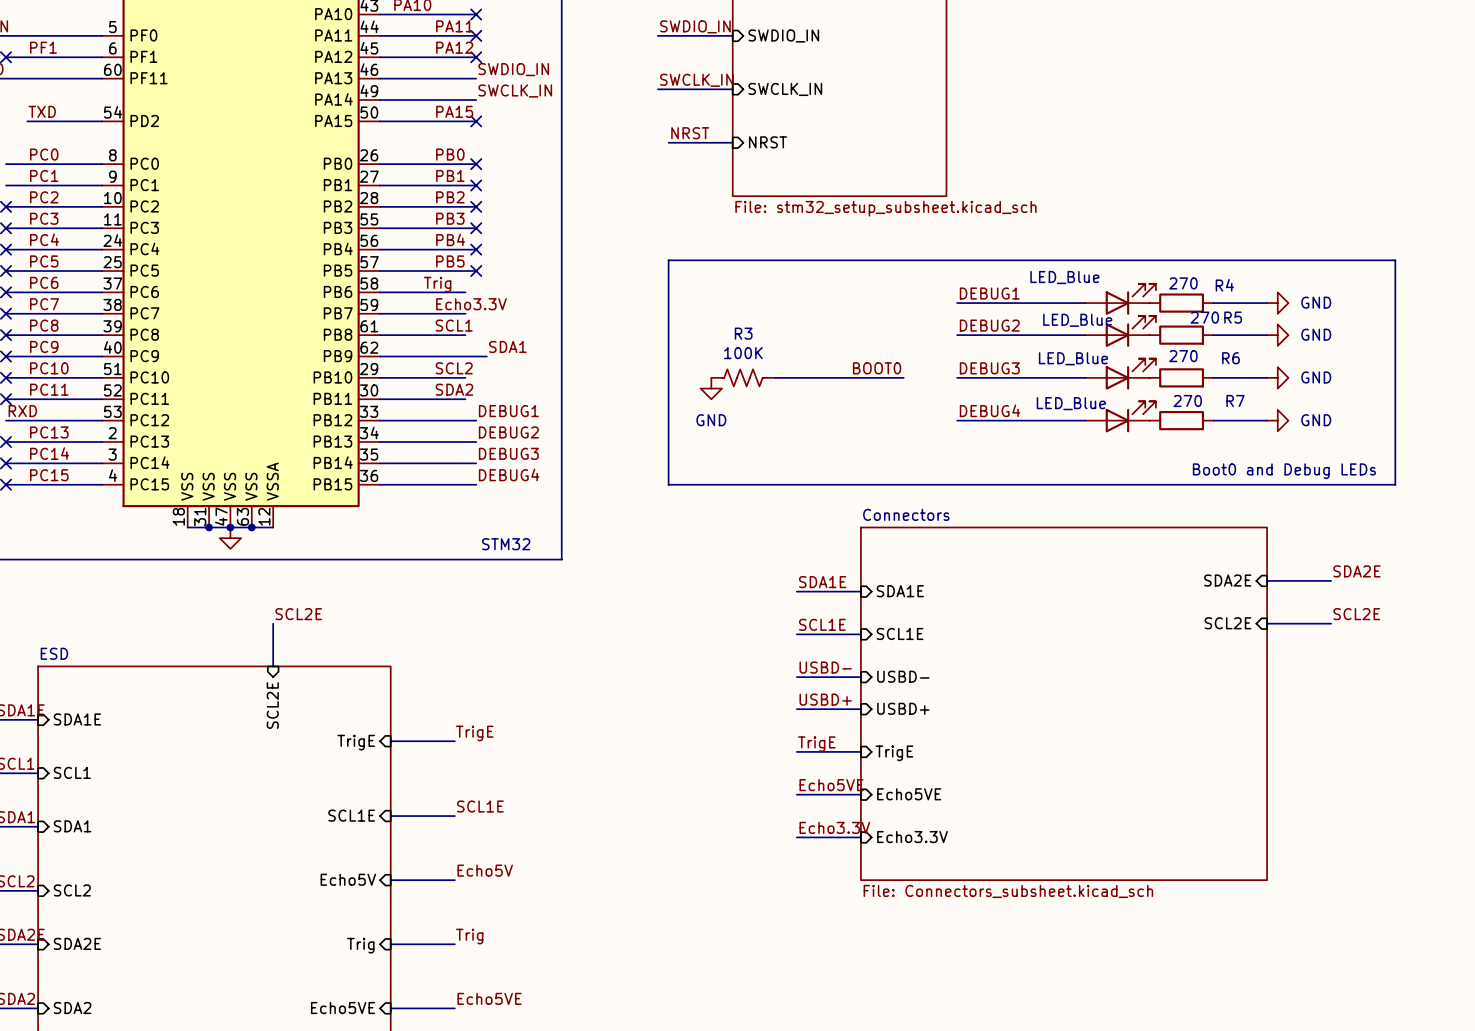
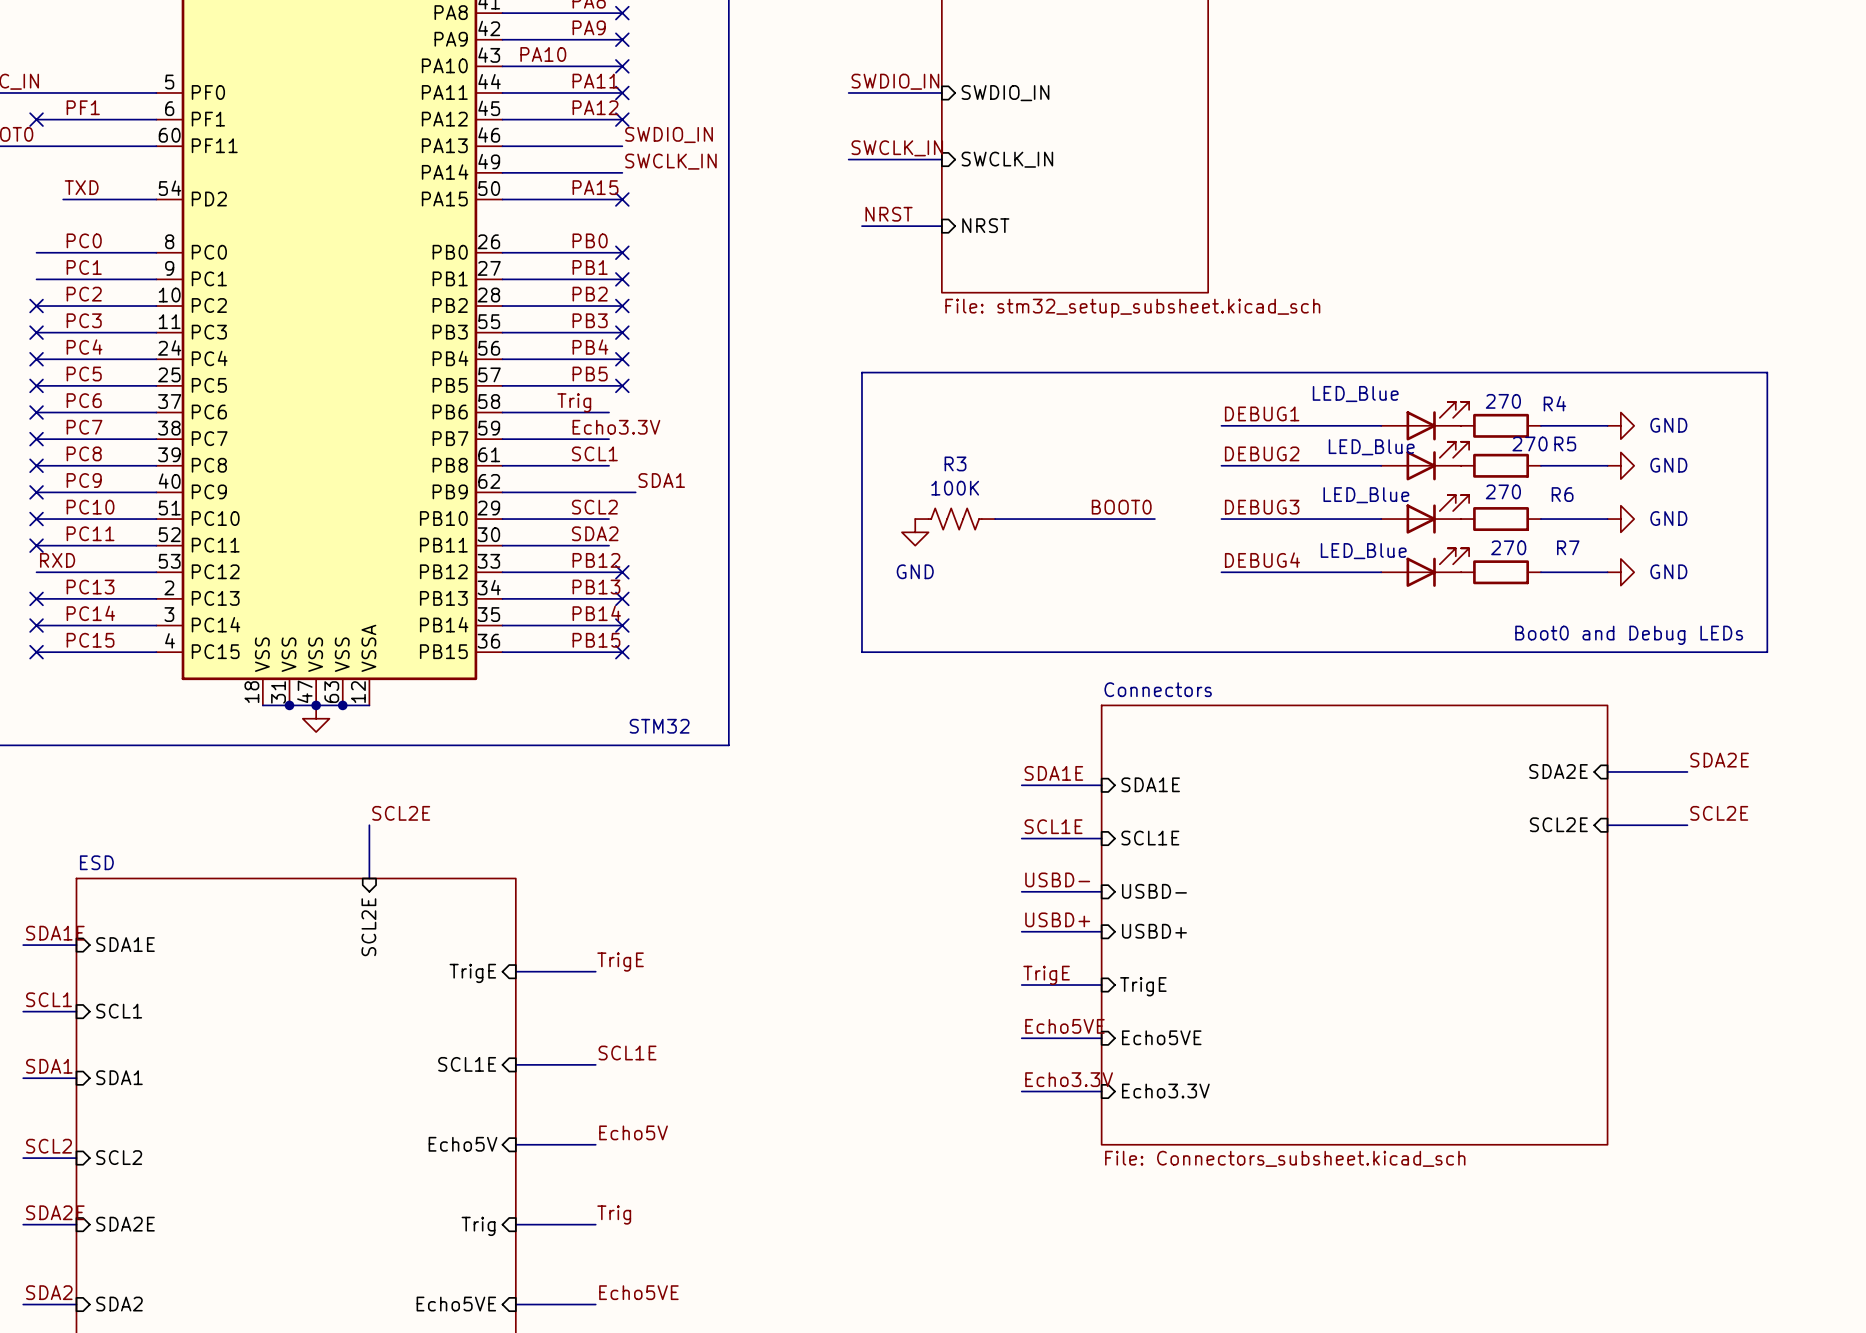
label: none -> PB12 (596, 560)
label: DEBUG1 (508, 411) -> none
no-connect mark: none -> (622, 572)
label: none -> PB13 (596, 587)
label: DEBUG2 (508, 432) -> none
no-connect mark: none -> (622, 598)
label: none -> PB14 (596, 613)
label: DEBUG3 (508, 453) -> none
no-connect mark: none -> (622, 625)
label: DEBUG4 (509, 474) -> none
label: none -> PB15 (596, 640)
no-connect mark: none -> (622, 652)

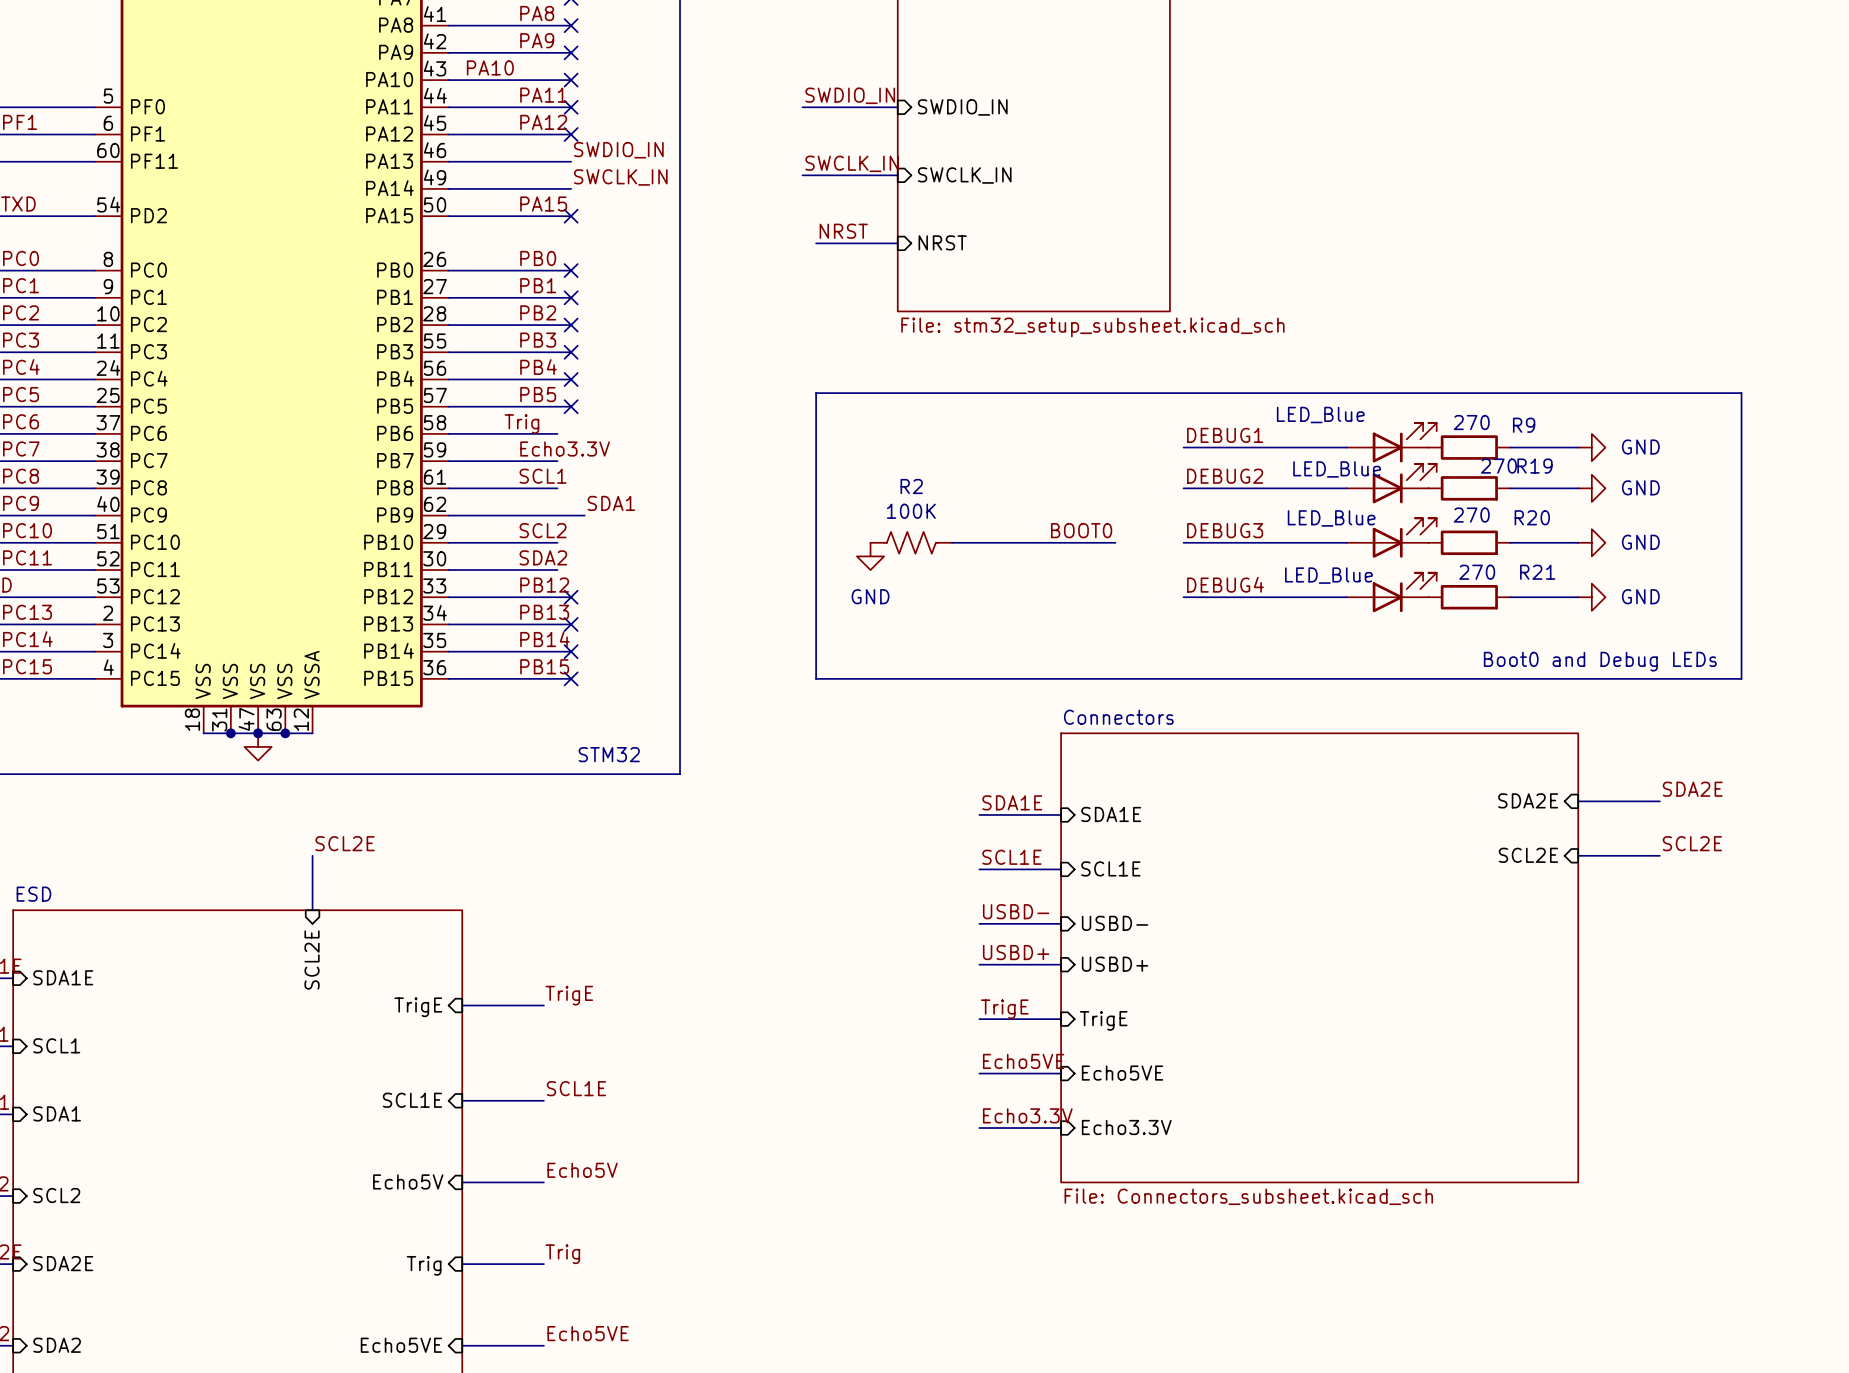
R4 name: R4 (1554, 403) -> R9 (1524, 425)
R5 name: R5 (1565, 443) -> R19 (1534, 466)
R3 name: R3 (955, 463) -> R2 (911, 486)
R6 name: R6 (1562, 494) -> R20 (1532, 517)
R7 name: R7 (1568, 547) -> R21 (1537, 572)

